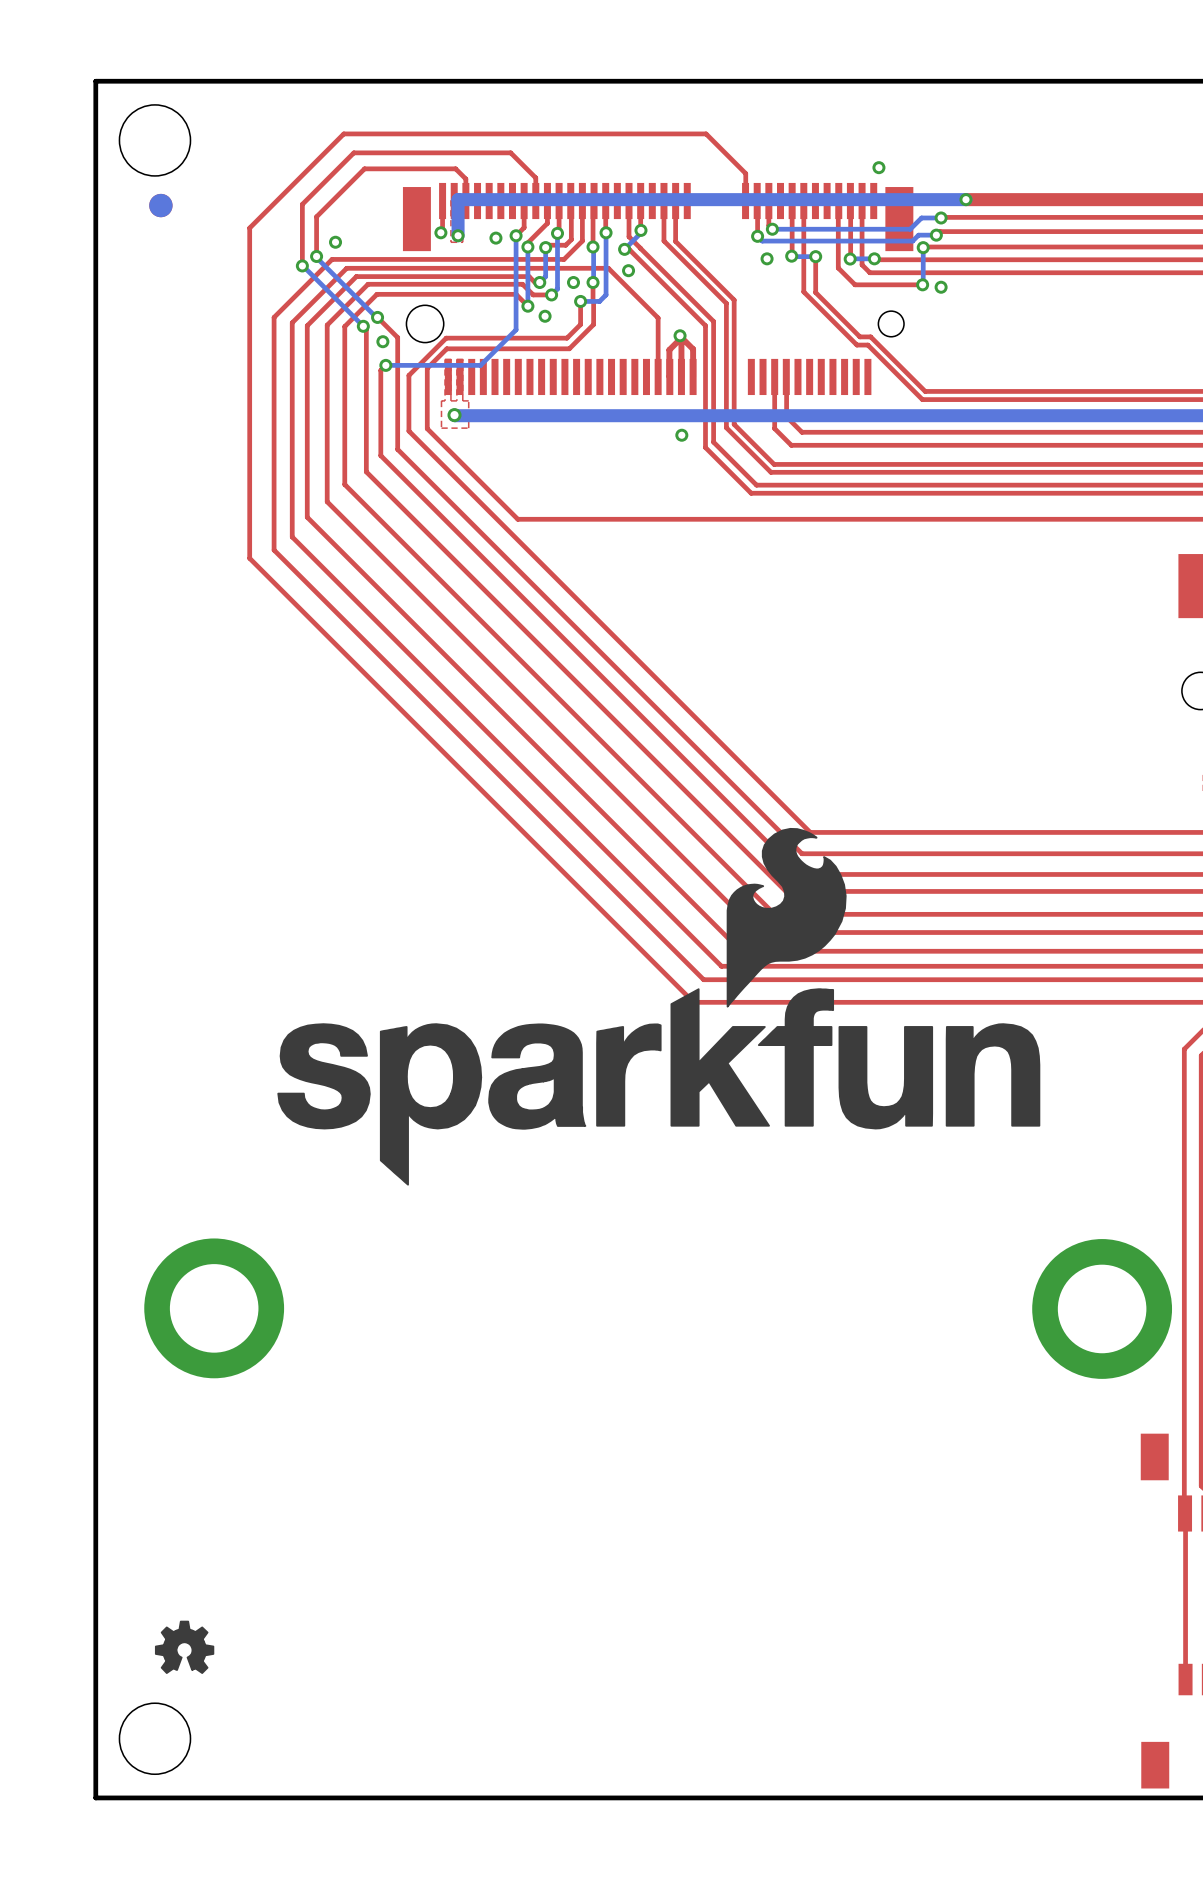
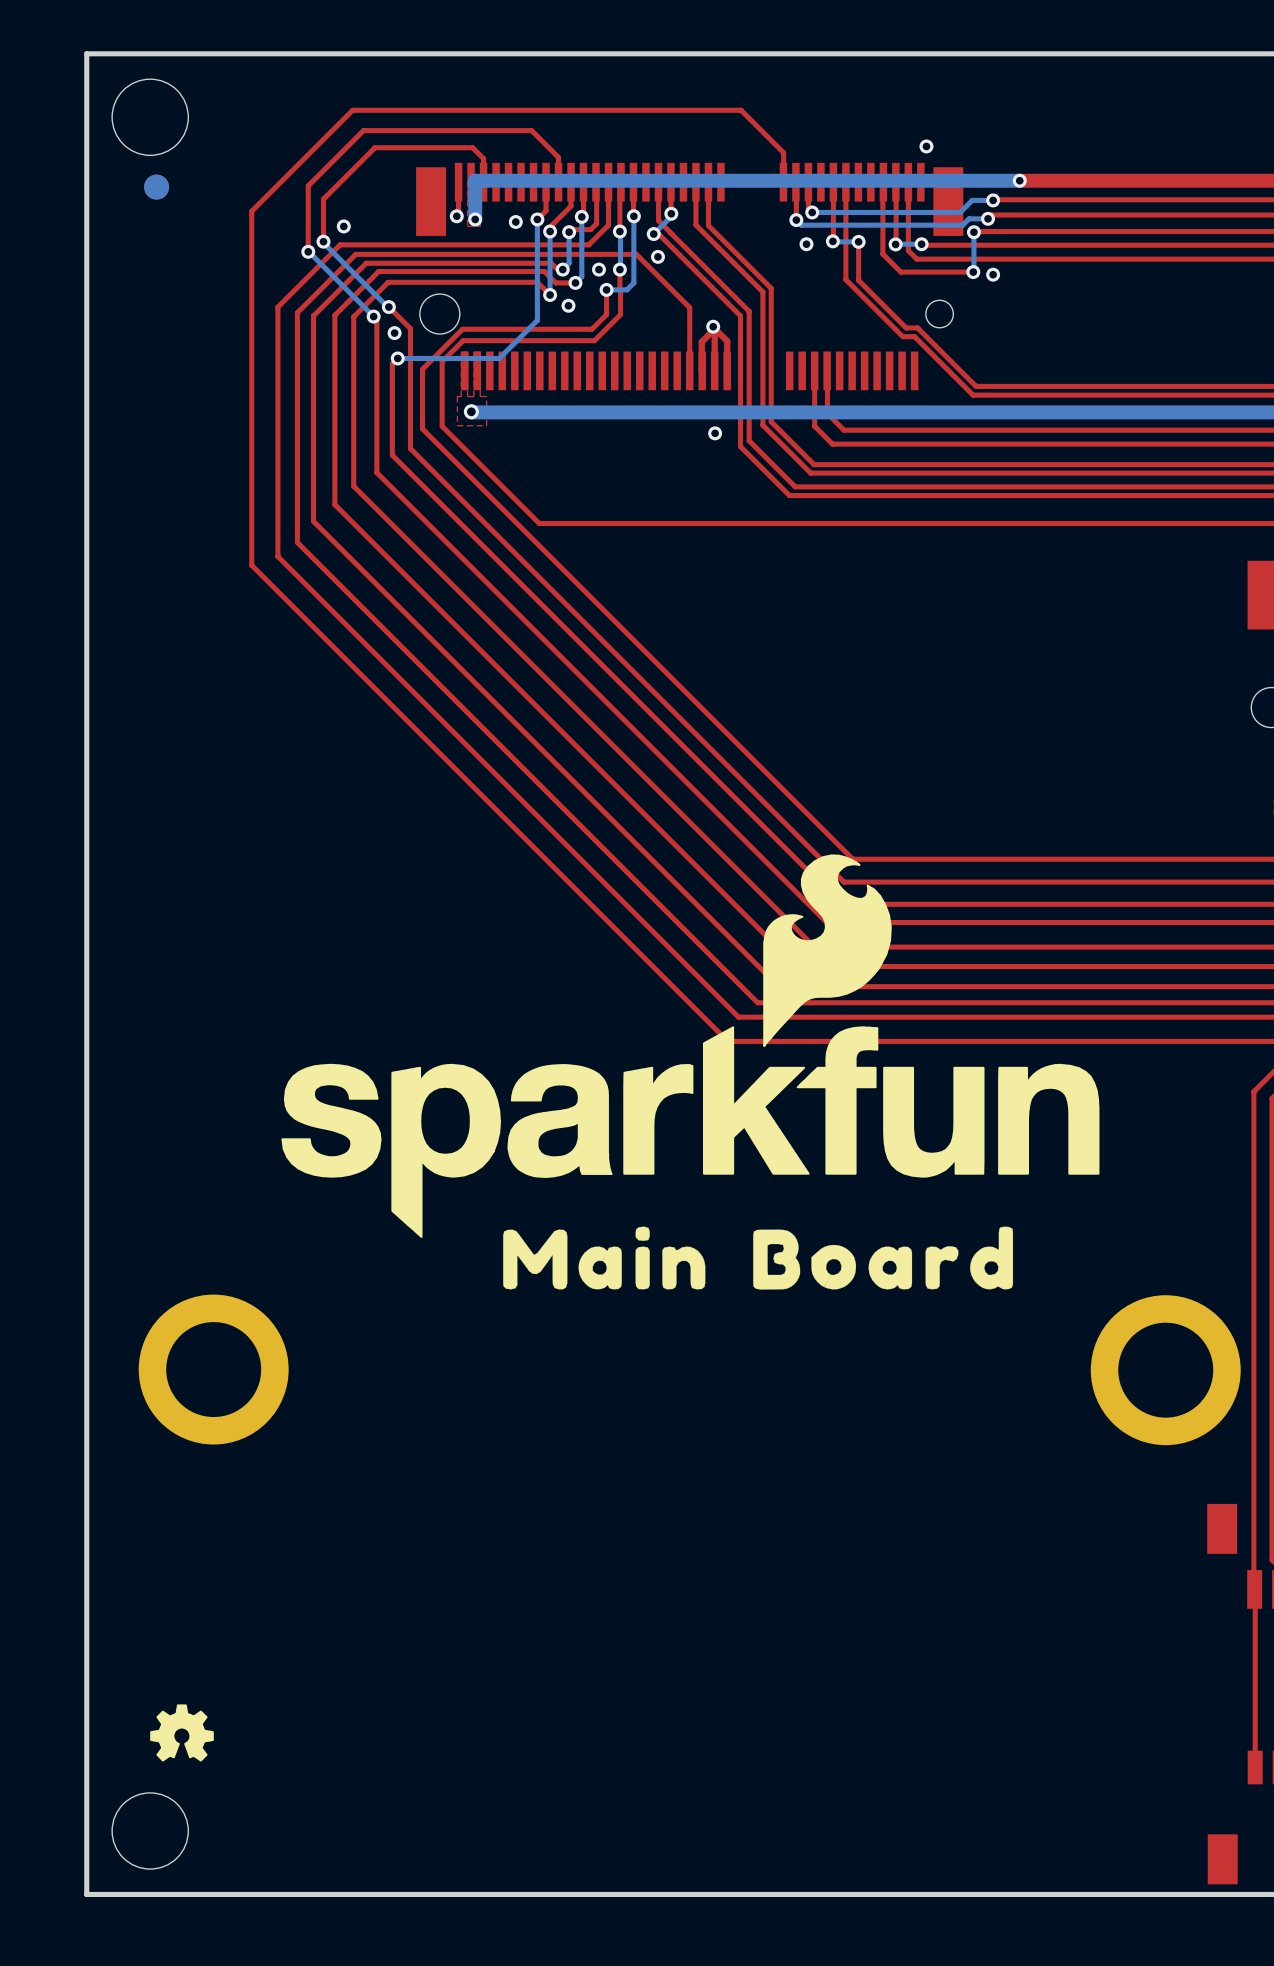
drawing: none -> [503, 1226, 706, 1290]
drawing: none -> [753, 1226, 1014, 1290]

